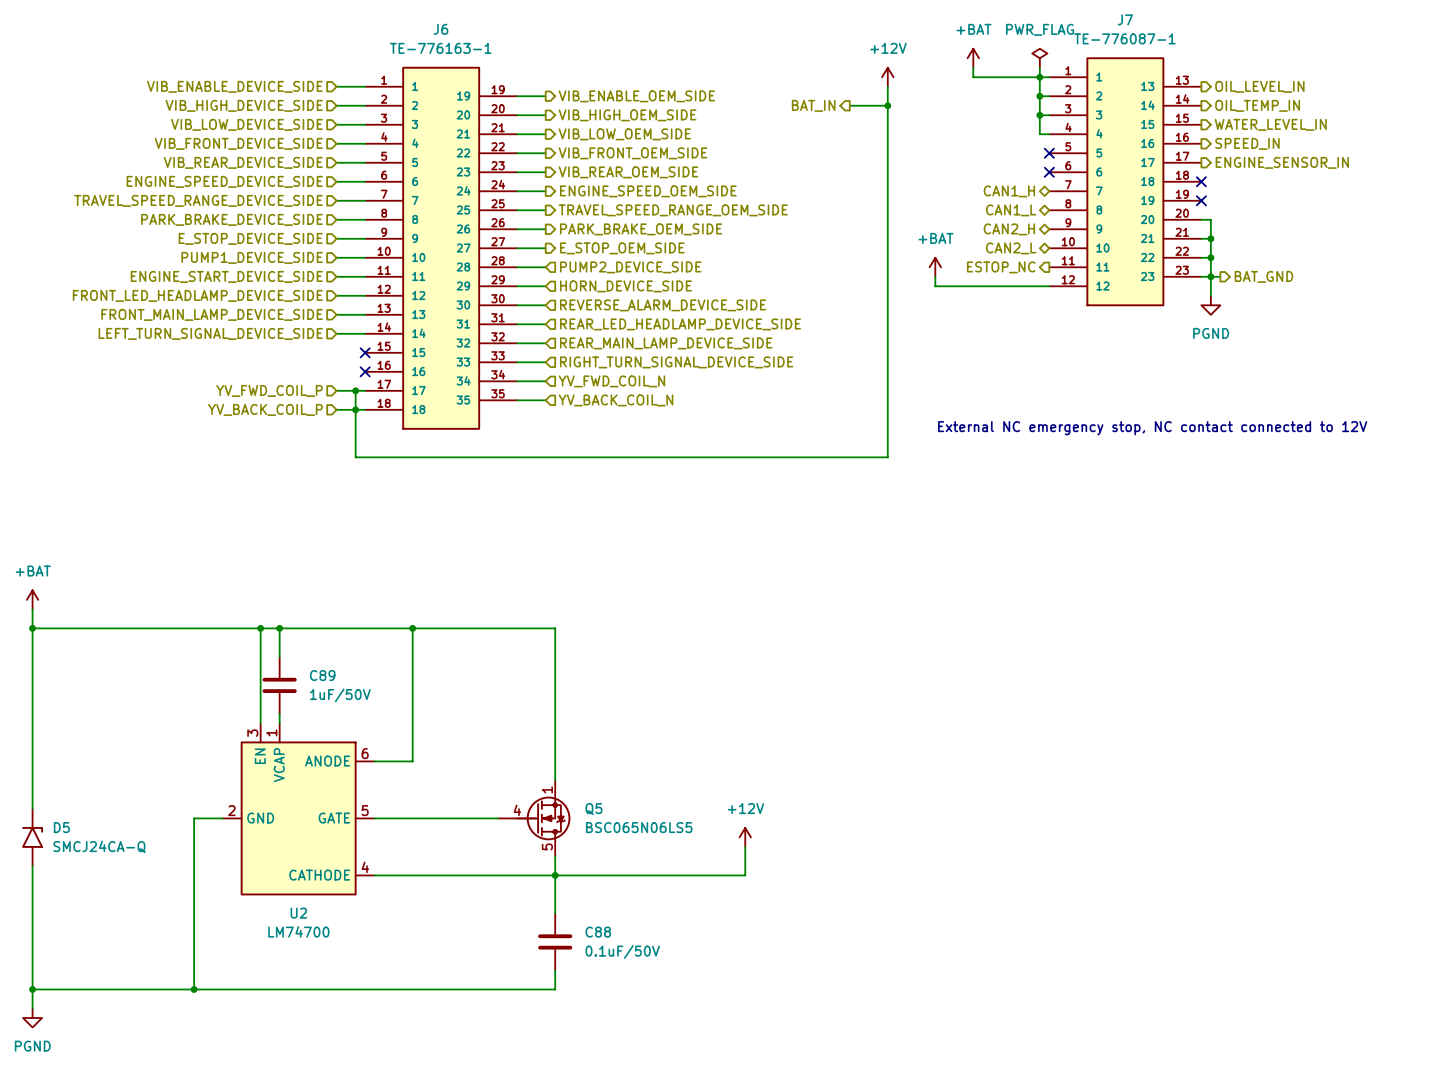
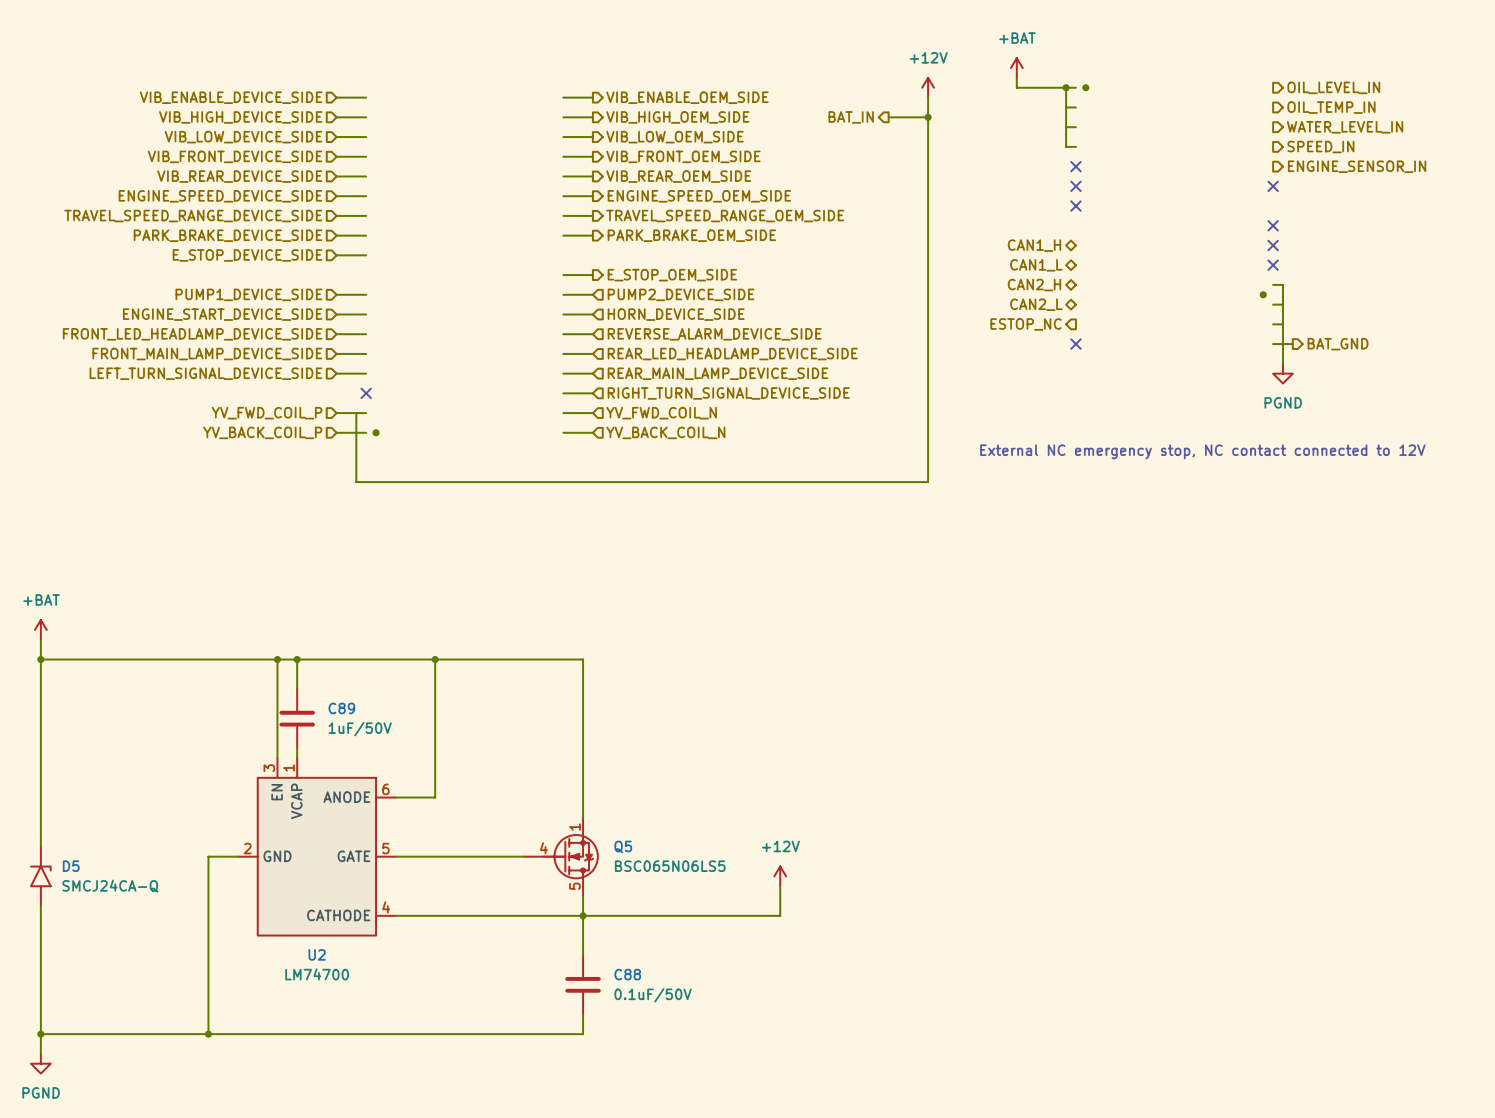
power symbol: PWR_FLAG (1039, 58) -> none
wire: (1039, 67) (1039, 134) (1049, 134) -> none
wire: none -> (1066, 87) (1066, 146) (1075, 146)
junction: none -> (1066, 87)
wire: (1030, 77) (1049, 77) -> none
hierarchical label position: VIB_ENABLE_DEVICE_SIDE (234, 86) -> VIB_ENABLE_DEVICE_SIDE (231, 97)
wire: (346, 86) (365, 86) -> (336, 97) (356, 97)
wire: none -> (563, 97) (592, 97)
hierarchical label position: OIL_LEVEL_IN (1259, 86) -> OIL_LEVEL_IN (1333, 87)
wire: (517, 96) (545, 96) -> (563, 156) (592, 156)
hierarchical label position: VIB_ENABLE_OEM_SIDE (636, 96) -> VIB_ENABLE_OEM_SIDE (687, 97)
wire: (1039, 96) (1049, 96) -> (1066, 107) (1075, 107)
junction: (1039, 96) -> none
hierarchical label position: VIB_HIGH_DEVICE_SIDE (244, 105) -> VIB_HIGH_DEVICE_SIDE (240, 117)
wire: (346, 105) (365, 105) -> (336, 117) (356, 117)
wire: none -> (563, 117) (592, 117)
hierarchical label position: OIL_TEMP_IN (1257, 105) -> OIL_TEMP_IN (1331, 107)
wire: (517, 115) (545, 115) -> (563, 176) (592, 176)
hierarchical label position: VIB_HIGH_OEM_SIDE (627, 115) -> VIB_HIGH_OEM_SIDE (677, 117)
wire: (1039, 115) (1049, 115) -> (1066, 127) (1075, 127)
junction: (1039, 115) -> none
hierarchical label position: VIB_LOW_DEVICE_SIDE (246, 124) -> VIB_LOW_DEVICE_SIDE (243, 137)
wire: (346, 124) (365, 124) -> (336, 137) (356, 137)
hierarchical label position: WATER_LEVEL_IN (1270, 124) -> WATER_LEVEL_IN (1345, 127)
wire: (517, 134) (545, 134) -> (563, 196) (592, 196)
hierarchical label position: VIB_LOW_OEM_SIDE (624, 134) -> VIB_LOW_OEM_SIDE (674, 137)
hierarchical label position: VIB_FRONT_DEVICE_SIDE (238, 143) -> VIB_FRONT_DEVICE_SIDE (235, 156)
wire: (346, 143) (365, 143) -> (336, 156) (356, 156)
hierarchical label position: SPEED_IN (1247, 143) -> SPEED_IN (1320, 147)
wire: (517, 153) (545, 153) -> (563, 215) (592, 215)
hierarchical label position: VIB_FRONT_OEM_SIDE (632, 153) -> VIB_FRONT_OEM_SIDE (683, 156)
no-connect mark: none -> (1075, 166)
no-connect mark: (1049, 153) -> none
hierarchical label position: VIB_REAR_DEVICE_SIDE (243, 162) -> VIB_REAR_DEVICE_SIDE (239, 176)
wire: (346, 162) (365, 162) -> (336, 176) (356, 176)
hierarchical label position: ENGINE_SENSOR_IN (1282, 162) -> ENGINE_SENSOR_IN (1357, 166)
wire: (517, 172) (545, 172) -> (563, 235) (592, 235)
hierarchical label position: VIB_REAR_OEM_SIDE (628, 172) -> VIB_REAR_OEM_SIDE (678, 176)
no-connect mark: none -> (1075, 186)
no-connect mark: (1049, 172) -> none
no-connect mark: none -> (1273, 186)
hierarchical label position: ENGINE_SPEED_DEVICE_SIDE (224, 181) -> ENGINE_SPEED_DEVICE_SIDE (220, 196)
wire: (346, 181) (365, 181) -> (336, 196) (356, 196)
J7: TE-776087-1 (1125, 181) -> none
no-connect mark: (1201, 181) -> none
wire: (517, 191) (545, 191) -> (563, 137) (592, 137)
hierarchical label position: ENGINE_SPEED_OEM_SIDE (648, 191) -> ENGINE_SPEED_OEM_SIDE (699, 196)
hierarchical label position: CAN1_H (1009, 191) -> CAN1_H (1034, 245)
no-connect mark: none -> (1075, 206)
hierarchical label position: TRAVEL_SPEED_RANGE_DEVICE_SIDE (198, 200) -> TRAVEL_SPEED_RANGE_DEVICE_SIDE (193, 216)
wire: (346, 200) (365, 200) -> (336, 215) (356, 215)
no-connect mark: (1201, 200) -> none
wire: (517, 210) (545, 210) -> (563, 275) (592, 275)
hierarchical label position: TRAVEL_SPEED_RANGE_OEM_SIDE (673, 210) -> TRAVEL_SPEED_RANGE_OEM_SIDE (725, 216)
hierarchical label position: CAN1_L (1011, 210) -> CAN1_L (1036, 265)
no-connect mark: none -> (1273, 225)
hierarchical label position: PARK_BRAKE_DEVICE_SIDE (231, 219) -> PARK_BRAKE_DEVICE_SIDE (228, 235)
wire: (346, 219) (365, 219) -> (336, 235) (356, 235)
wire: (1201, 219) (1210, 219) (1210, 295) -> (1273, 284) (1282, 284) (1282, 363)
wire: (517, 229) (545, 229) -> (563, 294) (592, 294)
hierarchical label position: PARK_BRAKE_OEM_SIDE (641, 229) -> PARK_BRAKE_OEM_SIDE (691, 235)
hierarchical label position: CAN2_H (1009, 229) -> CAN2_H (1034, 285)
no-connect mark: none -> (1273, 245)
hierarchical label position: E_STOP_DEVICE_SIDE (250, 238) -> E_STOP_DEVICE_SIDE (247, 255)
wire: (346, 238) (365, 238) -> (336, 255) (356, 255)
wire: (1201, 238) (1210, 238) -> (1273, 304) (1282, 304)
junction: (1210, 238) -> none
J6: TE-776163-1 (441, 248) -> none
wire: (517, 248) (545, 248) -> (563, 314) (592, 314)
hierarchical label position: E_STOP_OEM_SIDE (622, 248) -> E_STOP_OEM_SIDE (672, 275)
hierarchical label position: CAN2_L (1011, 248) -> CAN2_L (1036, 304)
no-connect mark: none -> (1273, 265)
hierarchical label position: PUMP1_DEVICE_SIDE (252, 257) -> PUMP1_DEVICE_SIDE (248, 294)
wire: (336, 257) (365, 257) -> (336, 373) (366, 373)
wire: (1201, 257) (1210, 257) -> (1273, 324) (1282, 324)
junction: (1210, 257) -> none
wire: (517, 267) (545, 267) -> (563, 334) (592, 334)
hierarchical label position: PUMP2_DEVICE_SIDE (630, 267) -> PUMP2_DEVICE_SIDE (681, 294)
power symbol: +BAT (935, 267) -> none
hierarchical label position: ESTOP_NC (1001, 267) -> ESTOP_NC (1026, 324)
hierarchical label position: ENGINE_START_DEVICE_SIDE (226, 276) -> ENGINE_START_DEVICE_SIDE (222, 314)
wire: (346, 276) (365, 276) -> (336, 294) (356, 294)
wire: (935, 276) (935, 286) (1049, 286) -> none
wire: (1201, 276) (1220, 276) -> (1273, 344) (1292, 344)
hierarchical label position: BAT_GND (1263, 276) -> BAT_GND (1338, 344)
wire: (517, 286) (545, 286) -> (563, 353) (592, 353)
hierarchical label position: HORN_DEVICE_SIDE (625, 286) -> HORN_DEVICE_SIDE (676, 314)
hierarchical label position: FRONT_LED_HEADLAMP_DEVICE_SIDE (197, 295) -> FRONT_LED_HEADLAMP_DEVICE_SIDE (192, 334)
wire: (346, 295) (365, 295) -> (336, 314) (356, 314)
wire: (517, 305) (545, 305) -> (563, 373) (592, 373)
hierarchical label position: REVERSE_ALARM_DEVICE_SIDE (663, 305) -> REVERSE_ALARM_DEVICE_SIDE (714, 334)
power symbol position: PGND (1210, 305) -> PGND (1282, 373)
hierarchical label position: FRONT_MAIN_LAMP_DEVICE_SIDE (212, 314) -> FRONT_MAIN_LAMP_DEVICE_SIDE (207, 354)
wire: (346, 314) (365, 314) -> (336, 334) (356, 334)
wire: (517, 324) (545, 324) -> (563, 393) (592, 393)
hierarchical label position: REAR_LED_HEADLAMP_DEVICE_SIDE (680, 324) -> REAR_LED_HEADLAMP_DEVICE_SIDE (732, 354)
no-connect mark: none -> (1075, 344)
hierarchical label position: LEFT_TURN_SIGNAL_DEVICE_SIDE (210, 333) -> LEFT_TURN_SIGNAL_DEVICE_SIDE (205, 373)
wire: (346, 333) (365, 333) -> (336, 353) (356, 353)
wire: (517, 343) (545, 343) -> (563, 413) (592, 413)
hierarchical label position: REAR_MAIN_LAMP_DEVICE_SIDE (666, 343) -> REAR_MAIN_LAMP_DEVICE_SIDE (717, 373)
no-connect mark: (365, 352) -> none
wire: (517, 362) (545, 362) -> (563, 432) (592, 432)
hierarchical label position: RIGHT_TURN_SIGNAL_DEVICE_SIDE (676, 362) -> RIGHT_TURN_SIGNAL_DEVICE_SIDE (728, 393)
no-connect mark: none -> (366, 393)
no-connect mark: (365, 371) -> none
wire: (517, 381) (545, 381) -> none
hierarchical label position: YV_FWD_COIL_N (611, 381) -> YV_FWD_COIL_N (661, 413)
hierarchical label position: YV_FWD_COIL_P (269, 390) -> YV_FWD_COIL_P (266, 413)
wire: (346, 390) (365, 390) -> none
wire: (355, 390) (355, 457) -> (336, 413) (356, 413) (356, 482) (376, 482)
junction: (355, 390) -> none
wire: (517, 400) (545, 400) -> none
hierarchical label position: YV_BACK_COIL_N (615, 400) -> YV_BACK_COIL_N (665, 432)
hierarchical label position: YV_BACK_COIL_P (265, 409) -> YV_BACK_COIL_P (262, 432)
wire: (346, 409) (365, 409) -> (336, 432) (356, 432)

